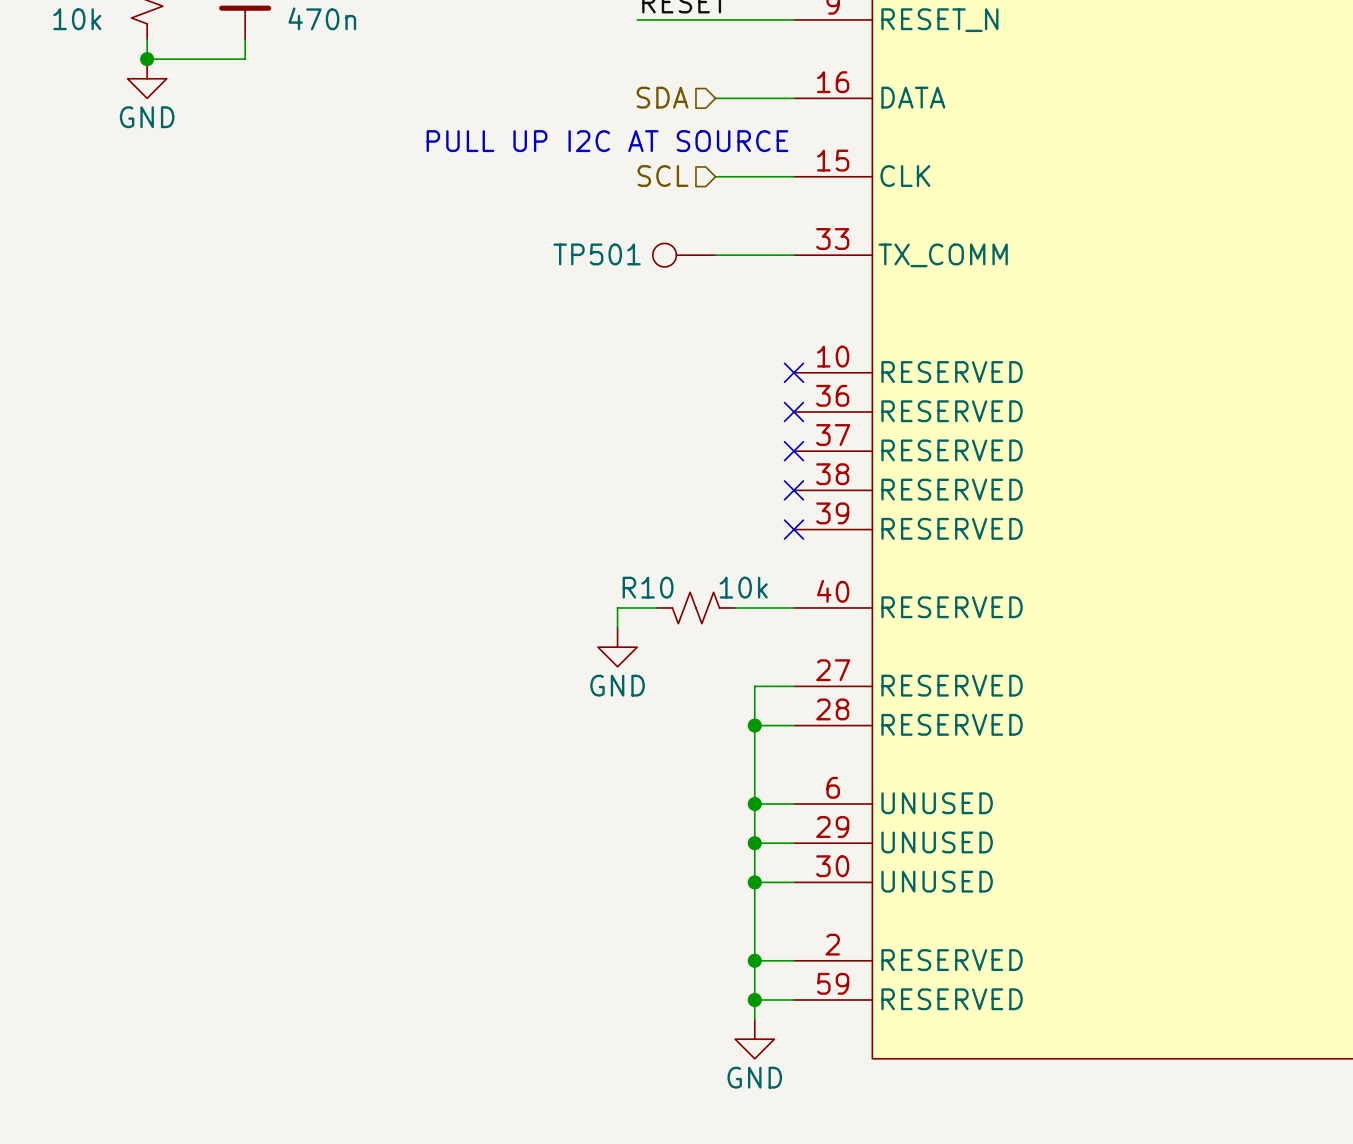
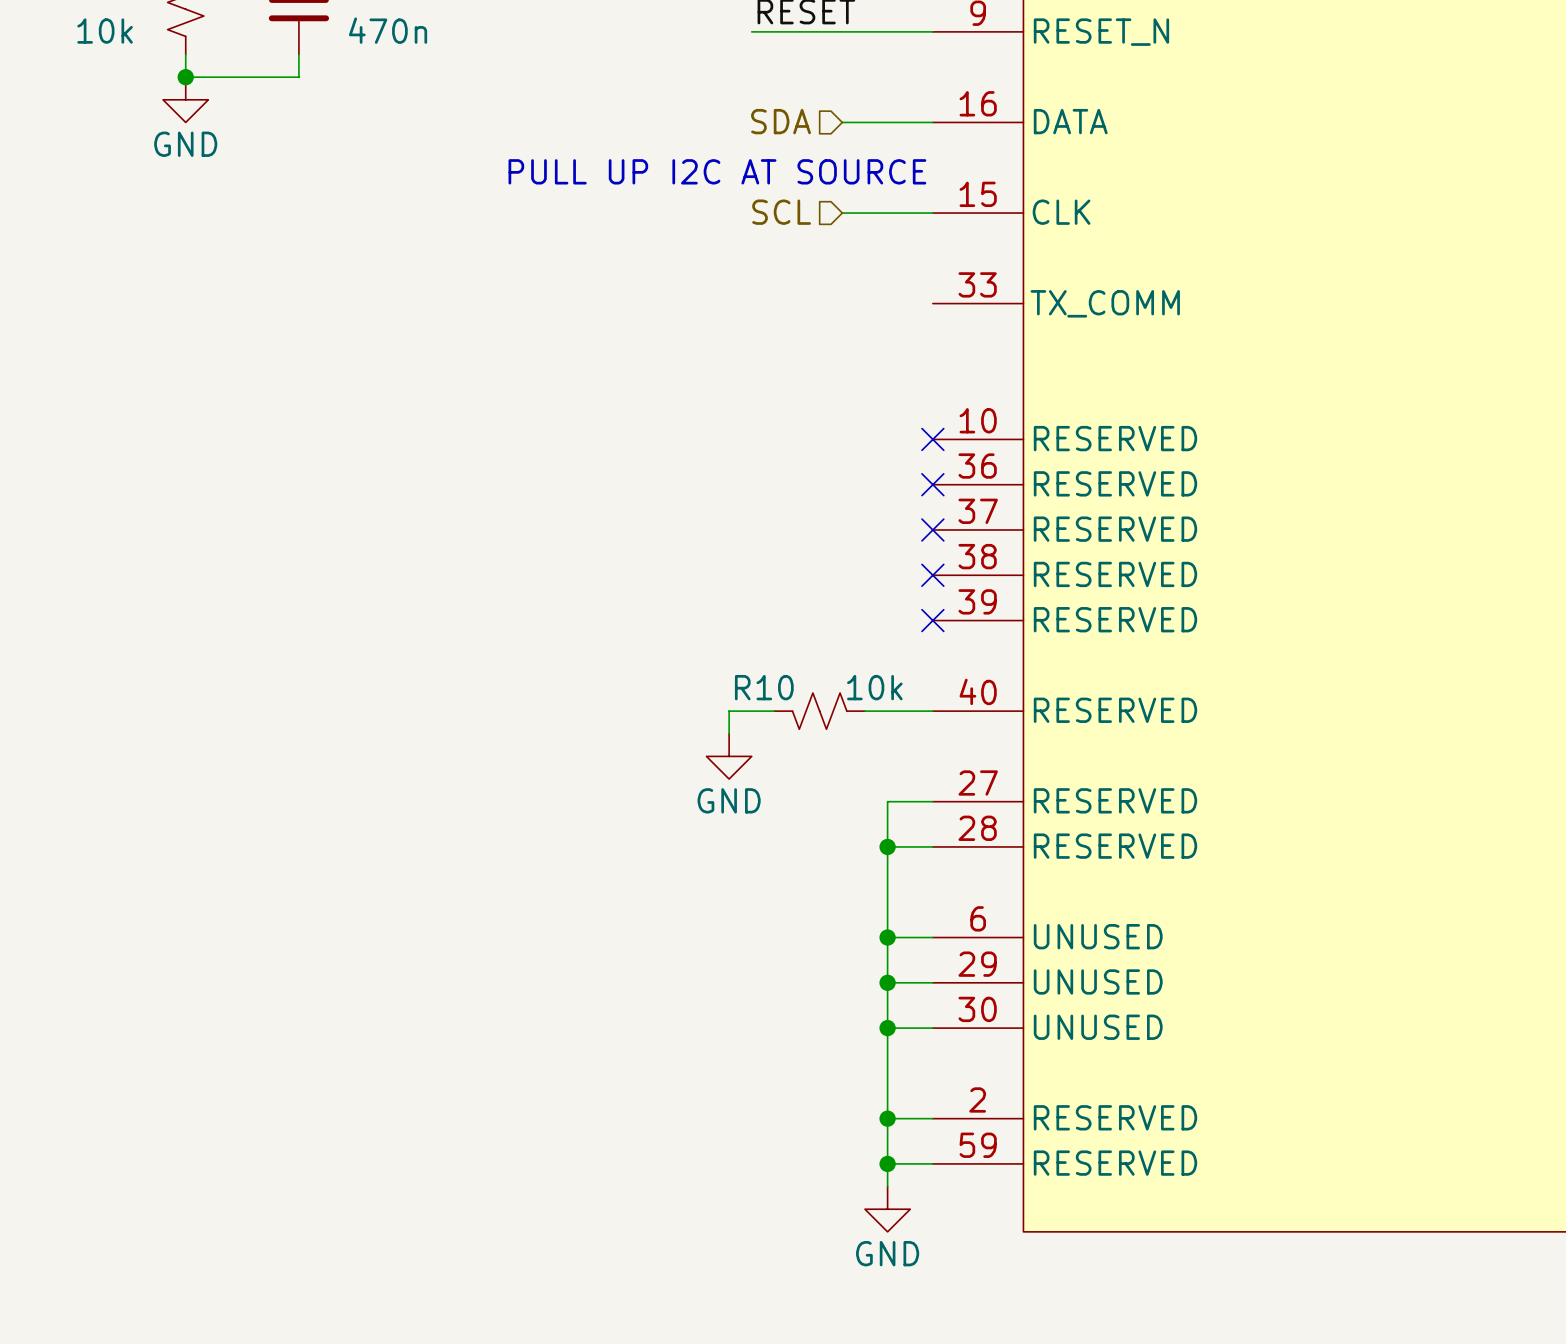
TP501: (684, 255) -> none
wire: (715, 255) (793, 255) -> none

